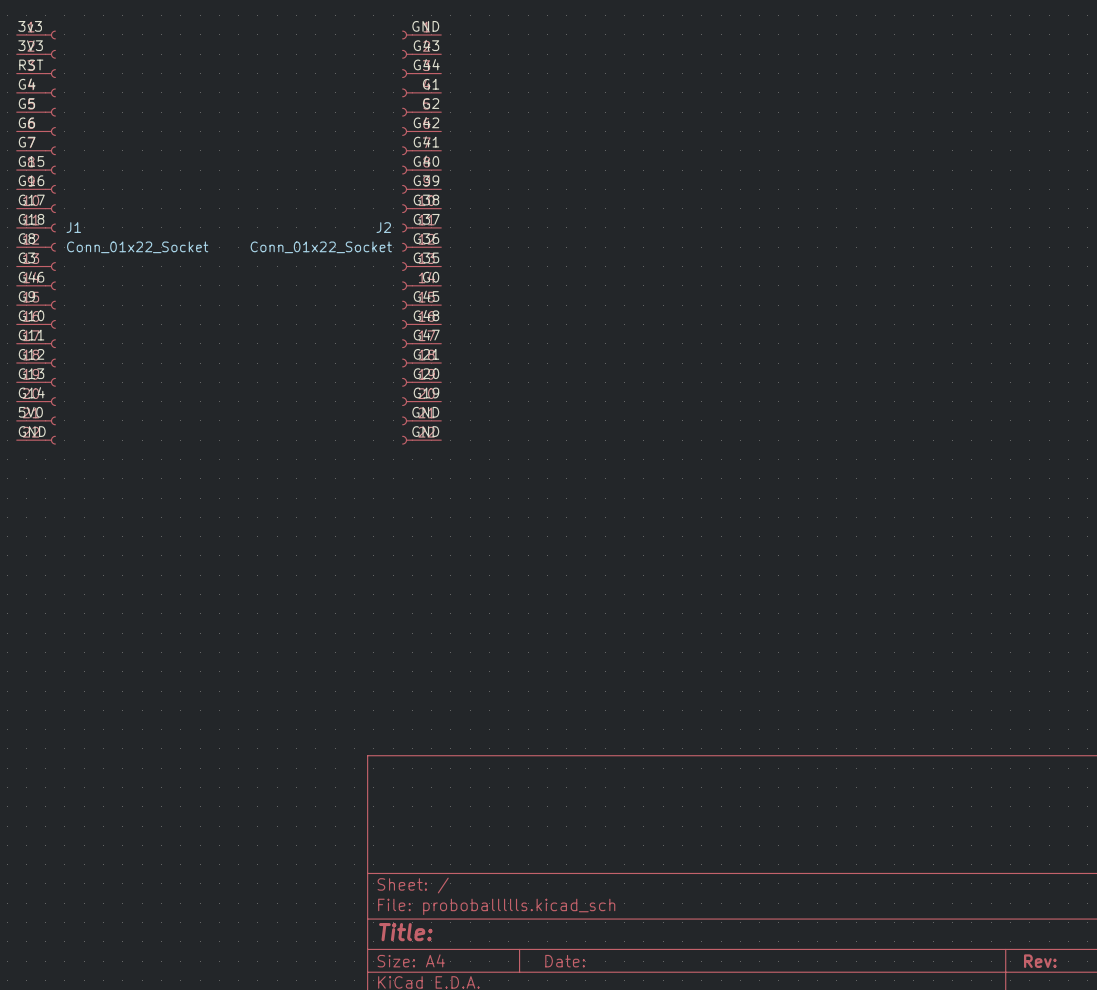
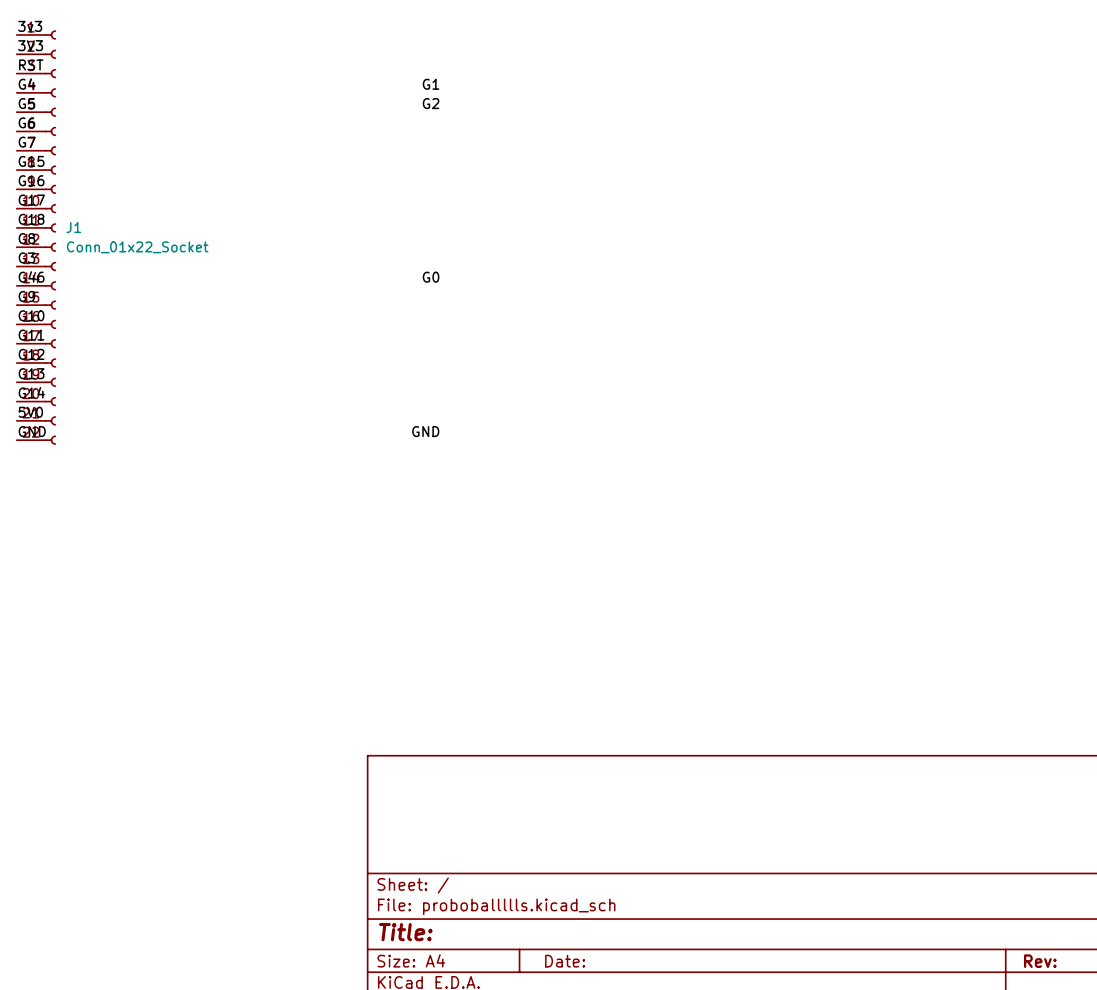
label: GND (425, 26) -> none
label: G43 (426, 45) -> none
label: G44 (426, 64) -> none
label: G42 (426, 122) -> none
label: G41 (426, 141) -> none
label: G40 (426, 161) -> none
label: G39 (426, 180) -> none
label: G38 (426, 200) -> none
label: G37 (426, 219) -> none
J2: Conn_01x22_Socket (421, 237) -> none
label: G36 (426, 238) -> none
label: G35 (426, 257) -> none
label: G45 (426, 296) -> none
label: G48 (426, 315) -> none
label: G47 (426, 334) -> none
label: G21 (426, 354) -> none
label: G20 (426, 373) -> none
label: G19 (426, 392) -> none
label: GND (425, 412) -> none

